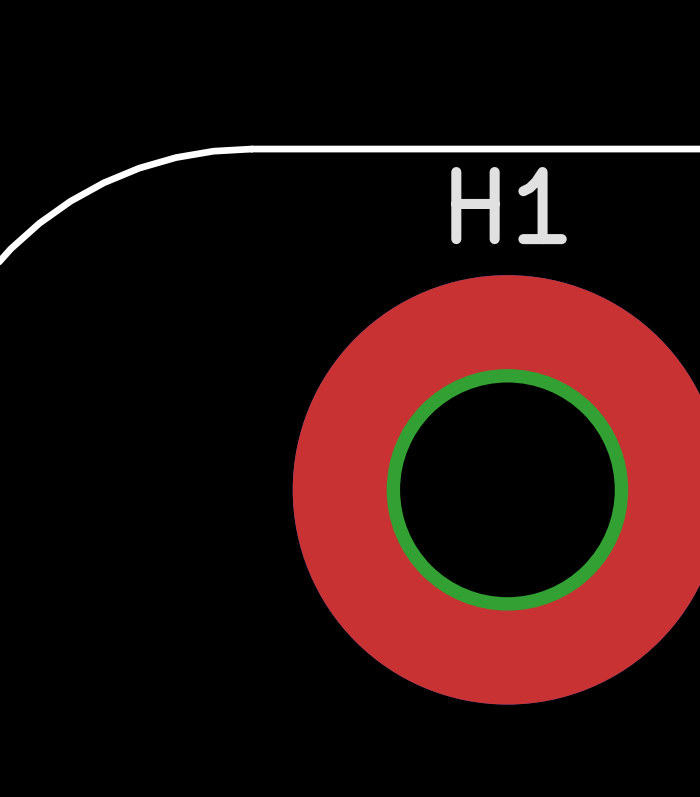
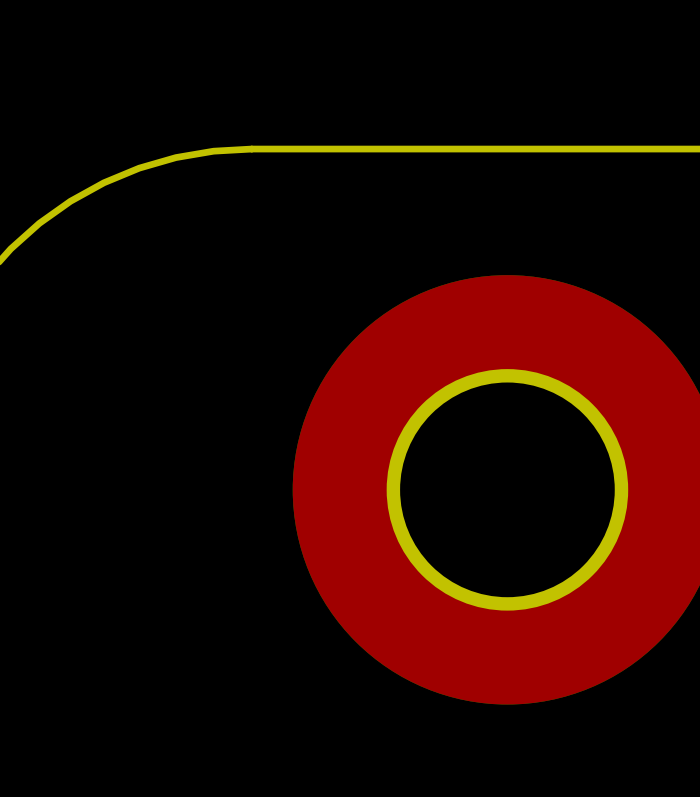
H1 name: H1 (509, 205) -> none

